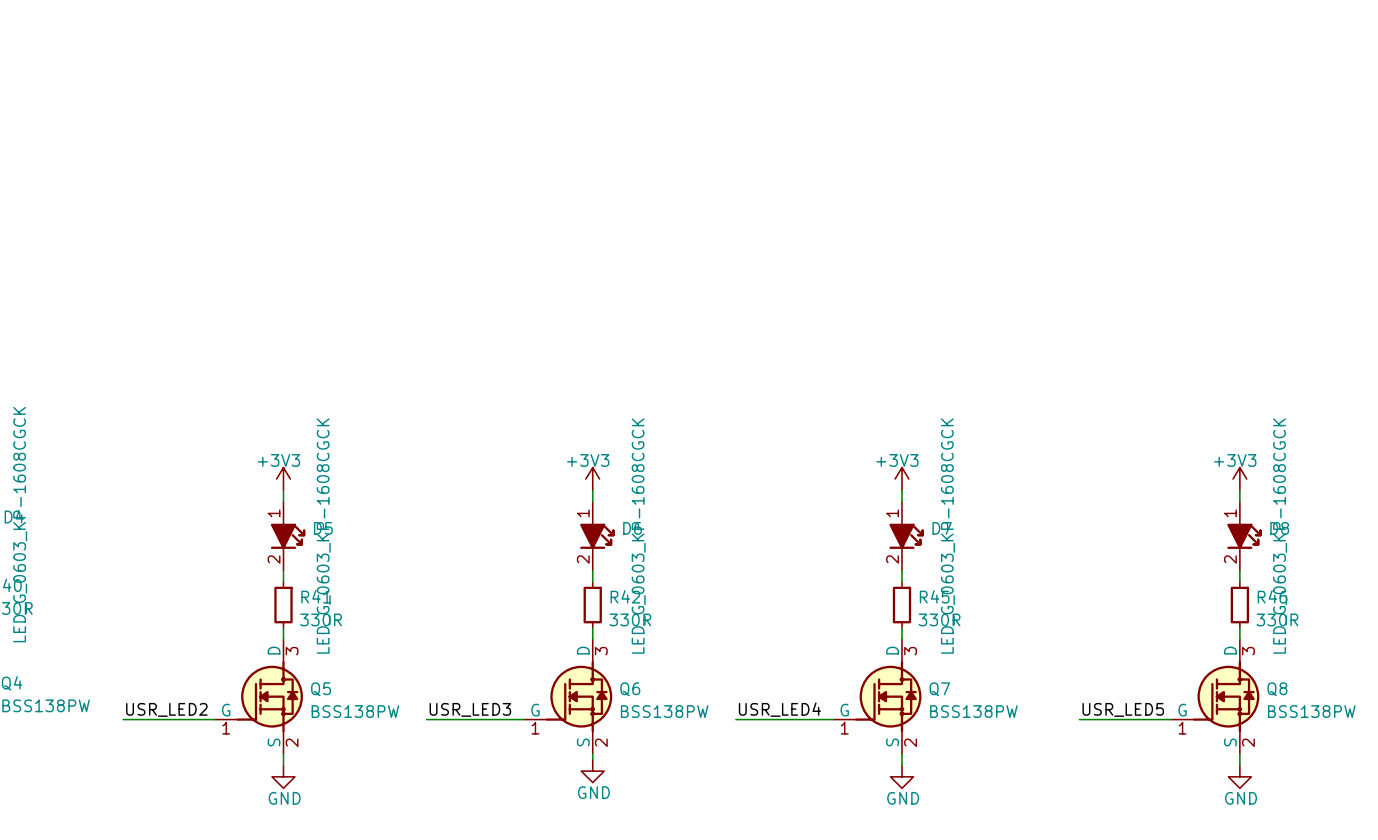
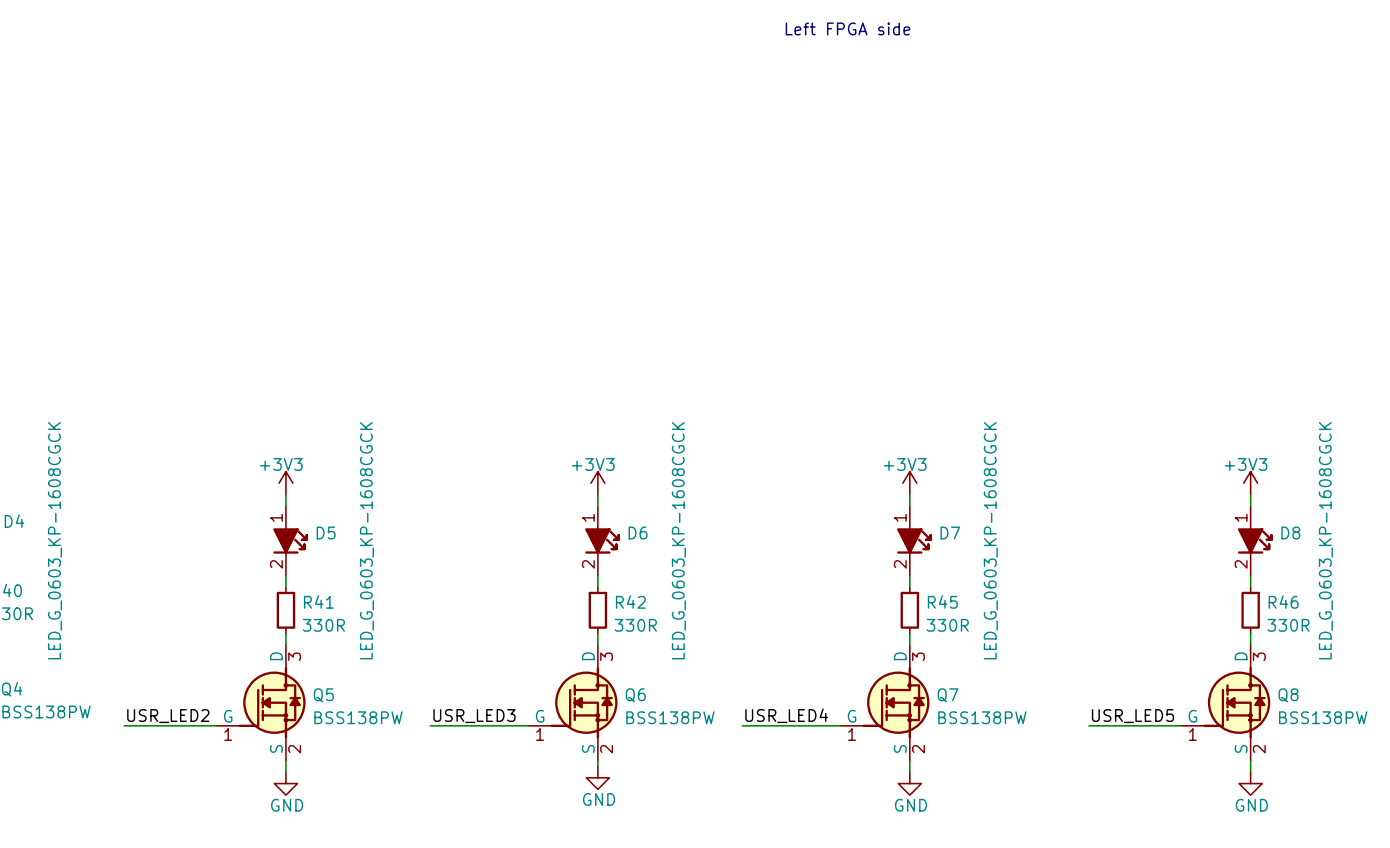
text: none -> Left FPGA side (848, 28)
D4 value position: LED_G_0603_KP-1608CGCK (20, 524) -> LED_G_0603_KP-1608CGCK (55, 540)
D5 value position: LED_G_0603_KP-1608CGCK (323, 536) -> LED_G_0603_KP-1608CGCK (366, 540)
D6 value position: LED_G_0603_KP-1608CGCK (638, 536) -> LED_G_0603_KP-1608CGCK (678, 540)
D7 value position: LED_G_0603_KP-1608CGCK (947, 536) -> LED_G_0603_KP-1608CGCK (990, 540)
D8 value position: LED_G_0603_KP-1608CGCK (1280, 536) -> LED_G_0603_KP-1608CGCK (1325, 540)

